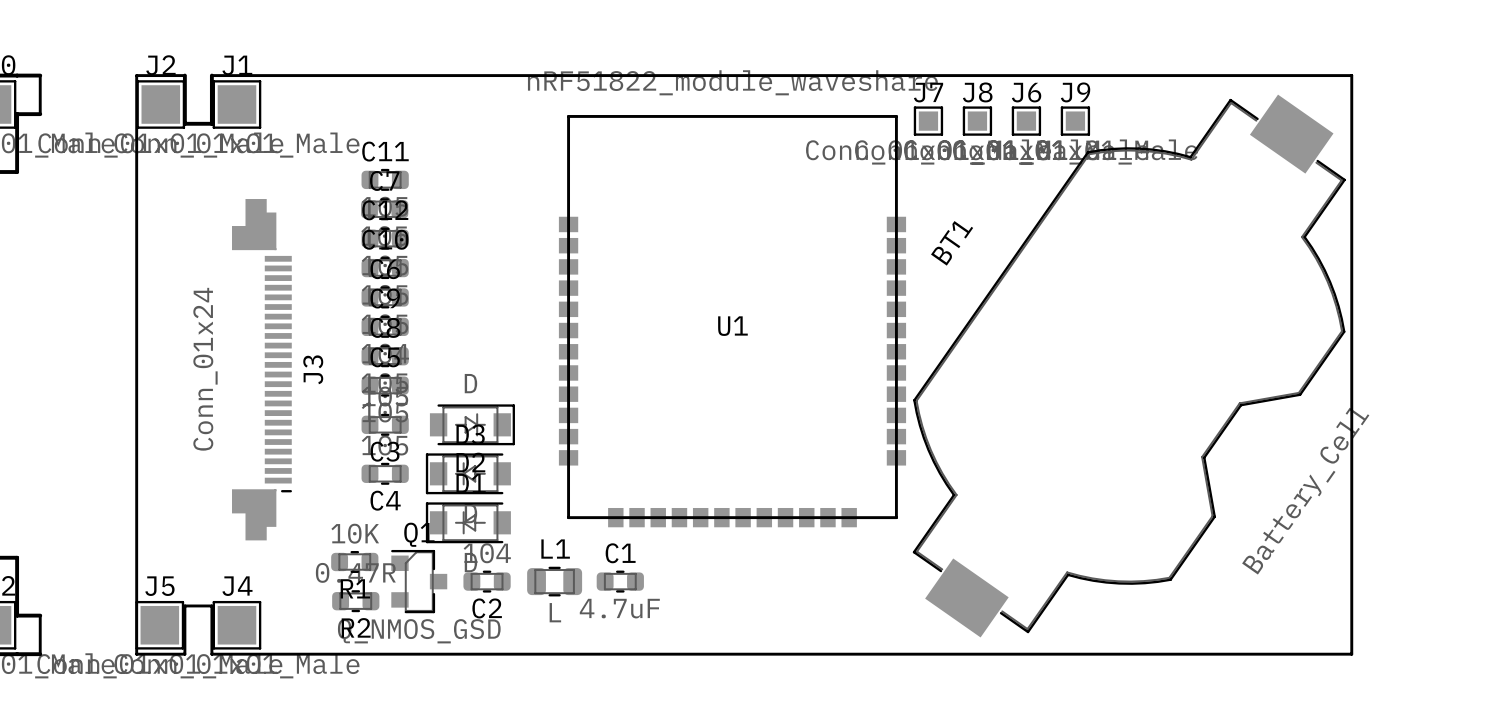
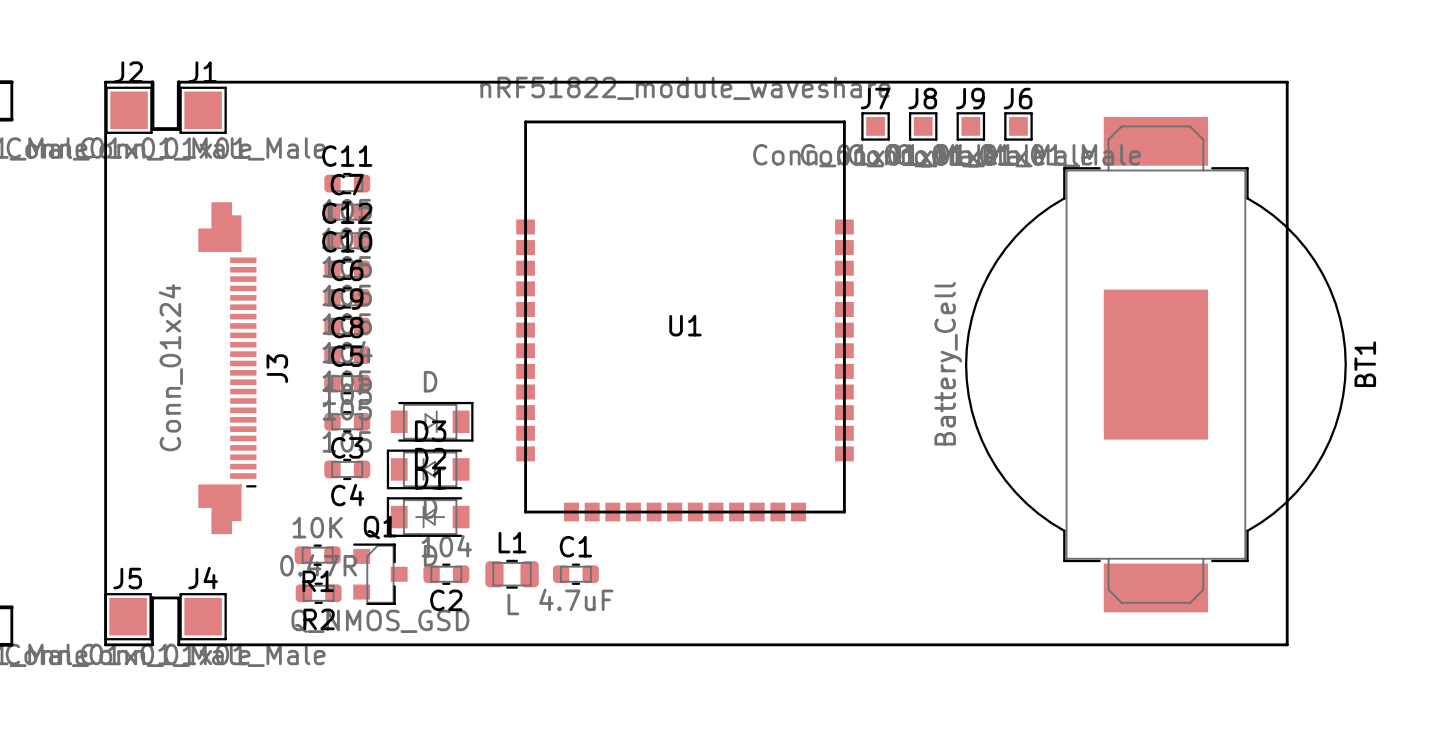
J6 name: J6 (1026, 92) -> J9 (970, 98)
J9 name: J9 (1075, 92) -> J6 (1018, 98)
BT1 footprint: [912, 94, 1346, 638] -> [964, 116, 1347, 613]
BT1 name position: BT1 (952, 243) -> BT1 (1365, 364)
BT1 value position: Battery_Cell (1305, 491) -> Battery_Cell (948, 363)

